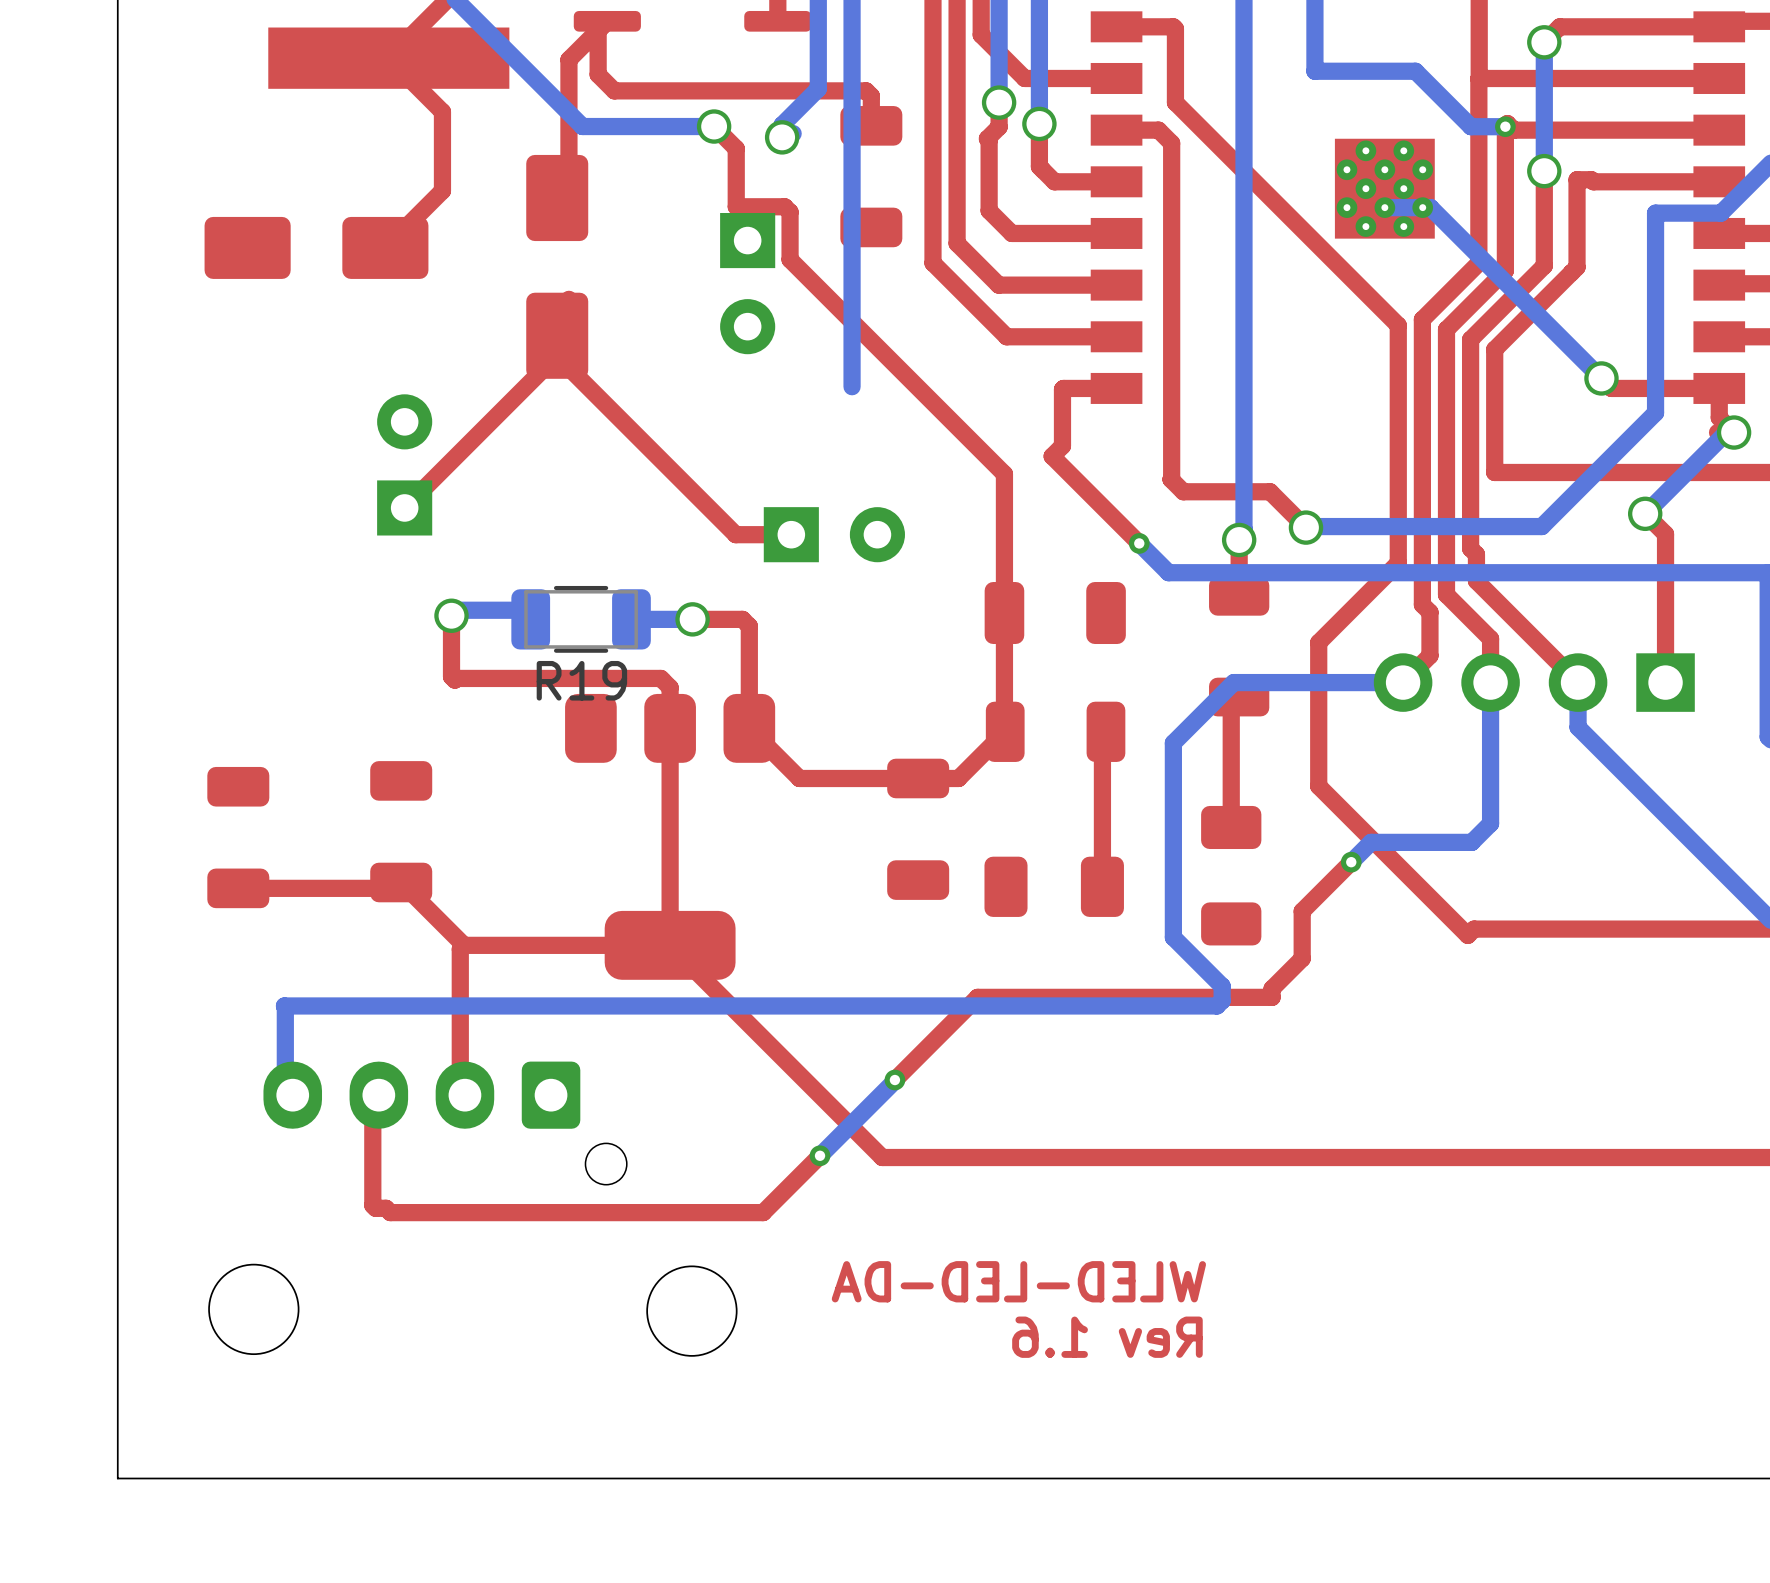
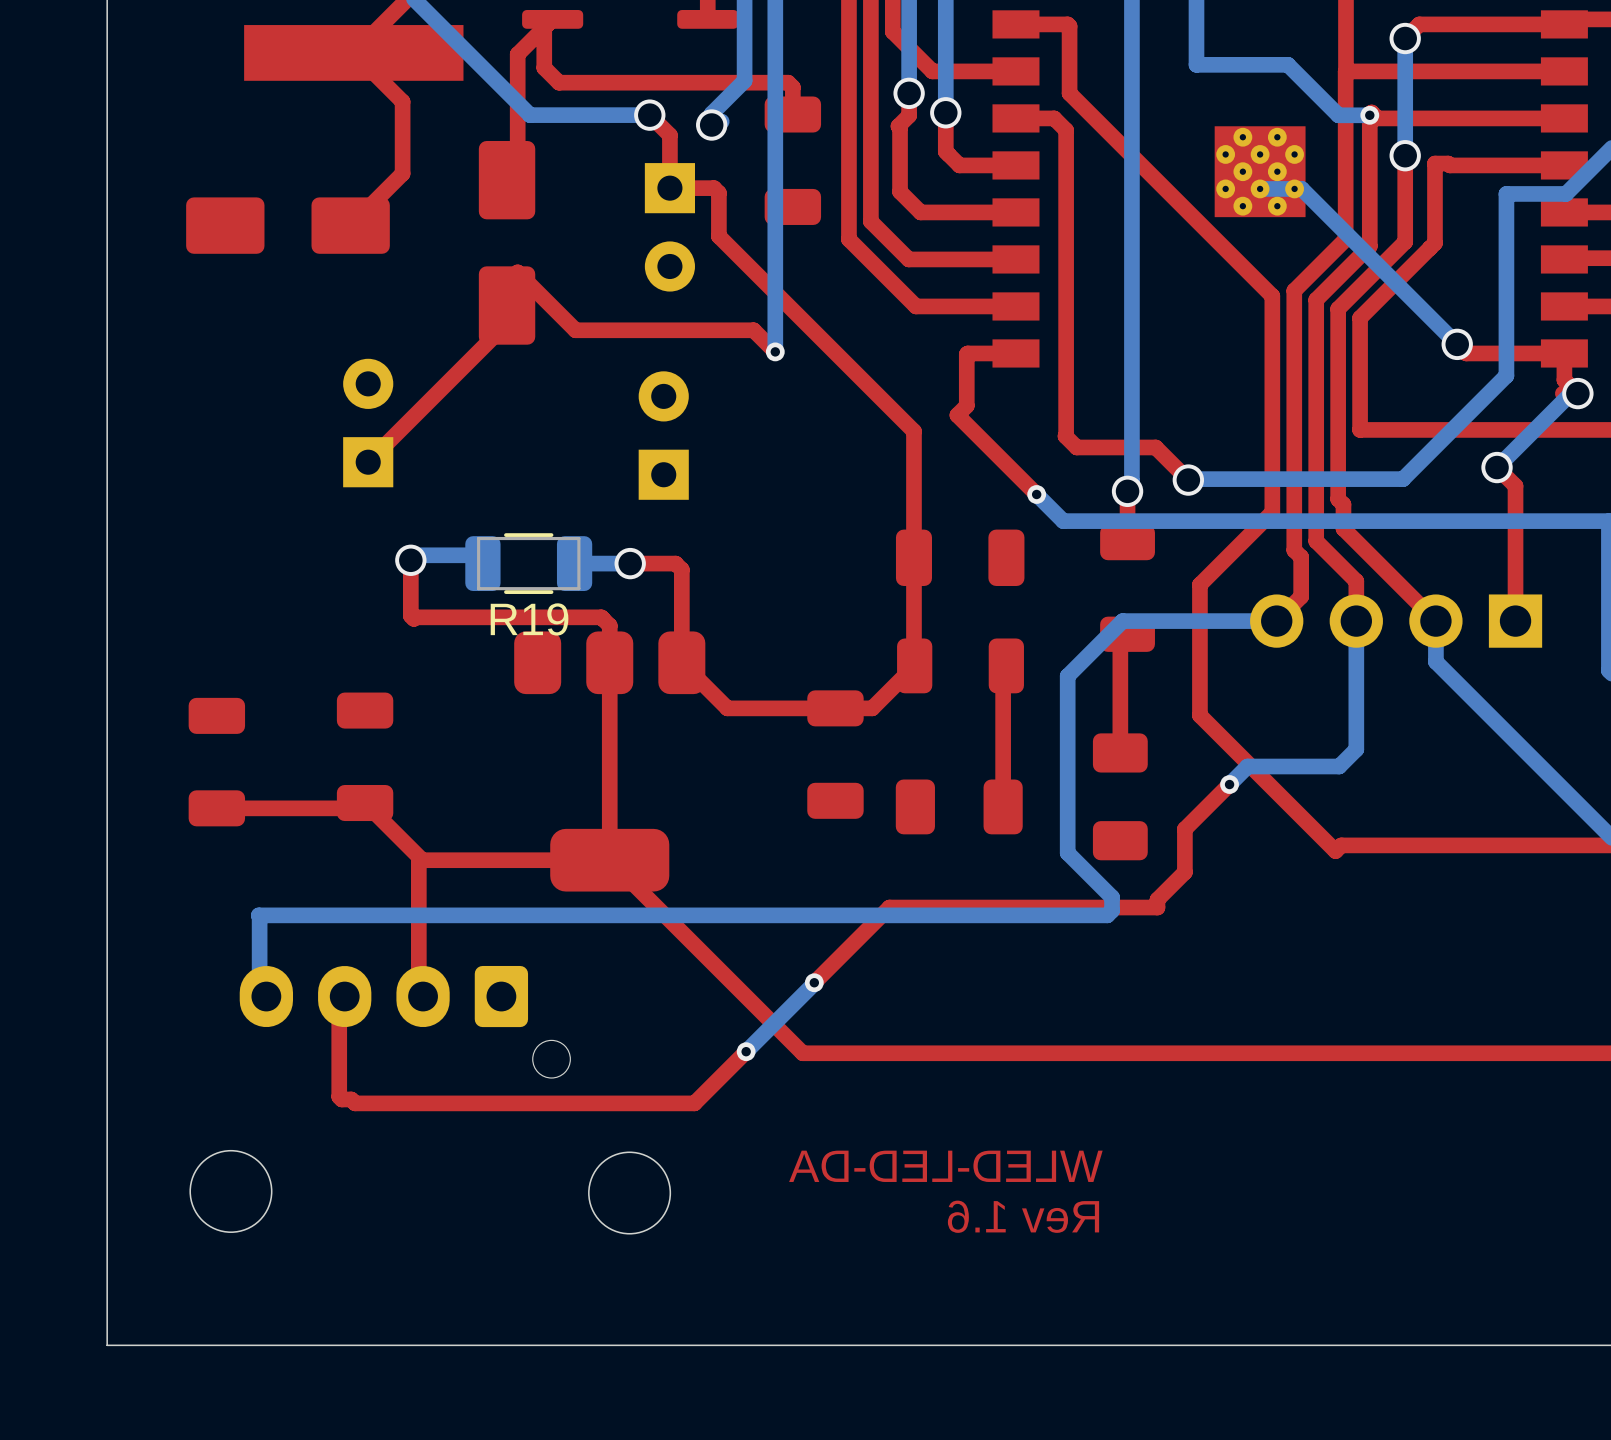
part position: (747, 283) -> (669, 227)
top track: none -> (517, 272) (575, 330) (753, 330) (775, 351)
top track: (557, 335) (557, 356) (735, 534) (791, 534) -> none
via: none -> (775, 351)
part: none -> (663, 435)
part: (834, 534) -> none

